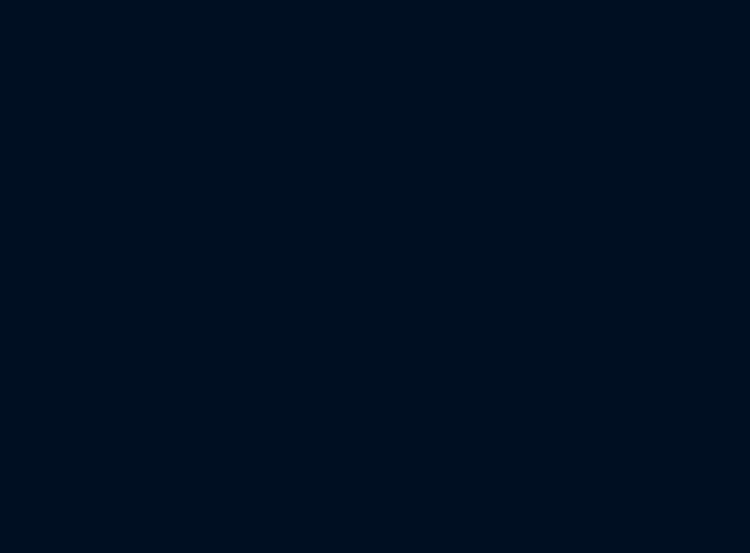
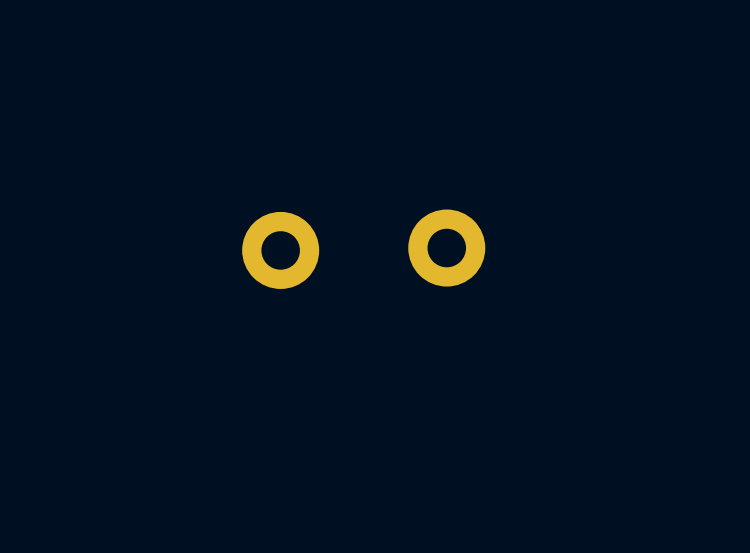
part: none -> (446, 248)
part: none -> (280, 250)

